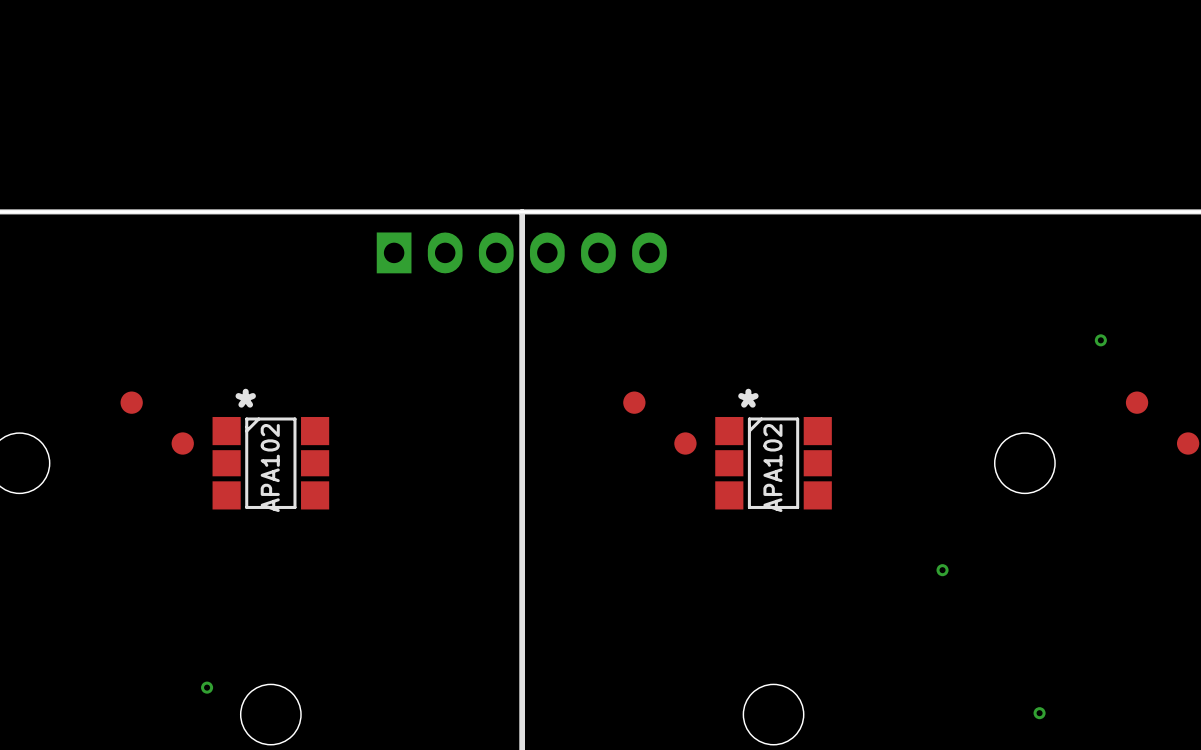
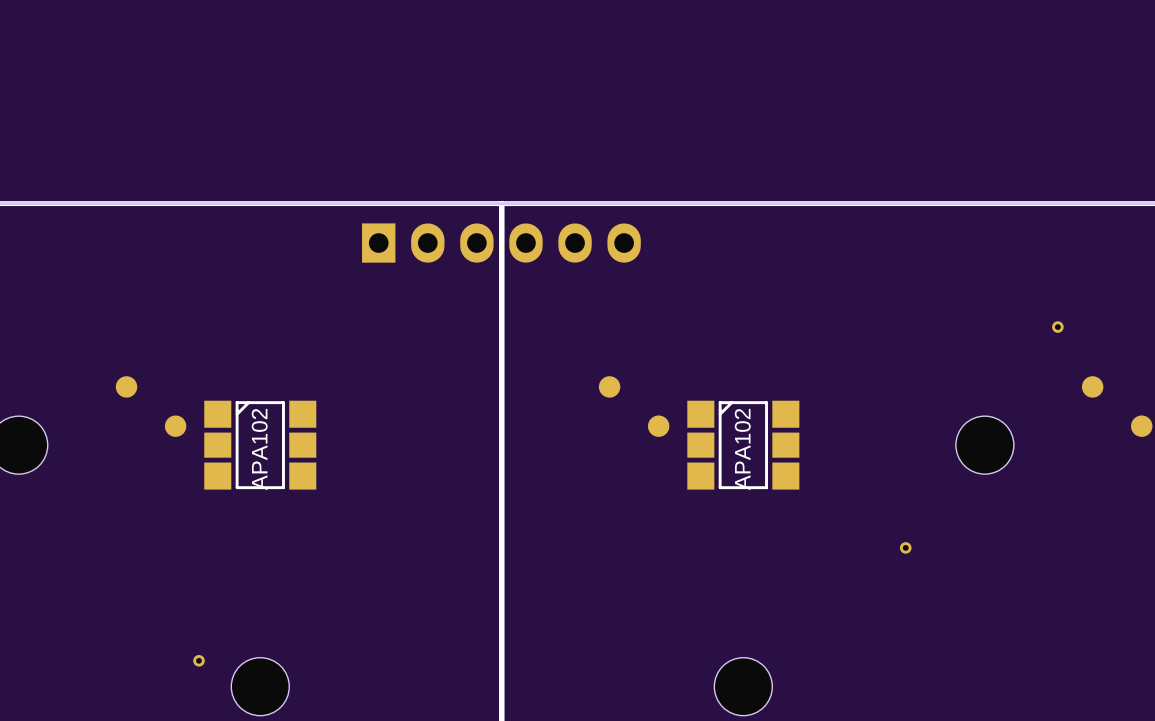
text: * (245, 398) -> none
text: * (748, 398) -> none
part: (1039, 713) -> none

